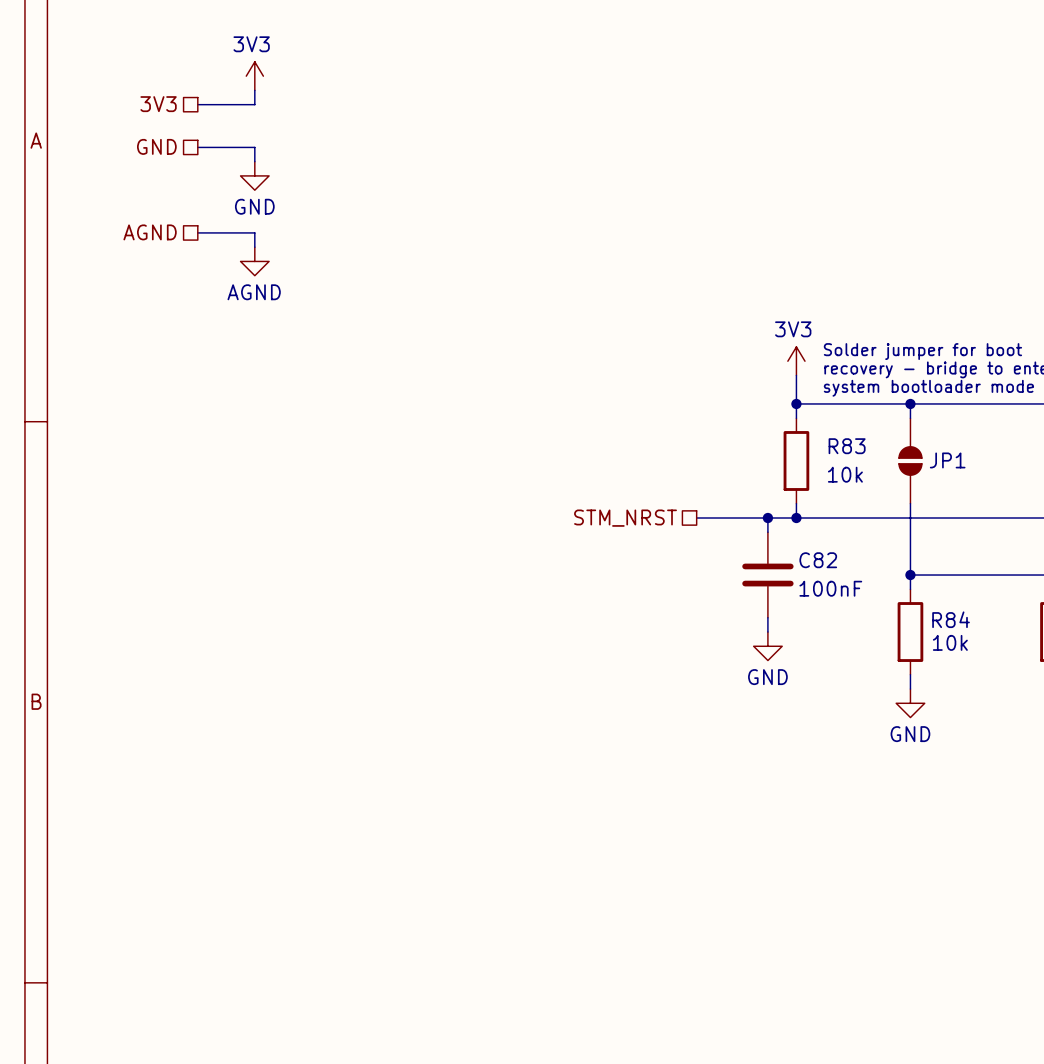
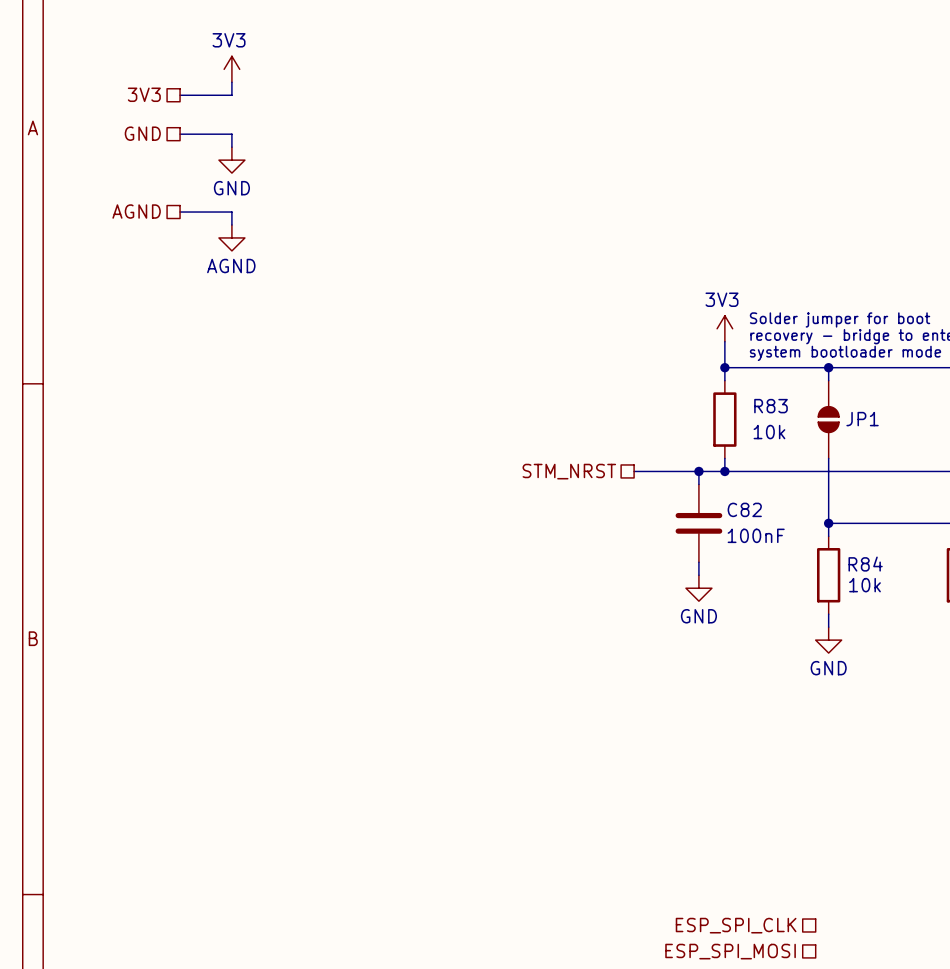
hierarchical label: none -> ESP_SPI_CLK (736, 925)
hierarchical label: none -> ESP_SPI_MOSI (730, 951)

